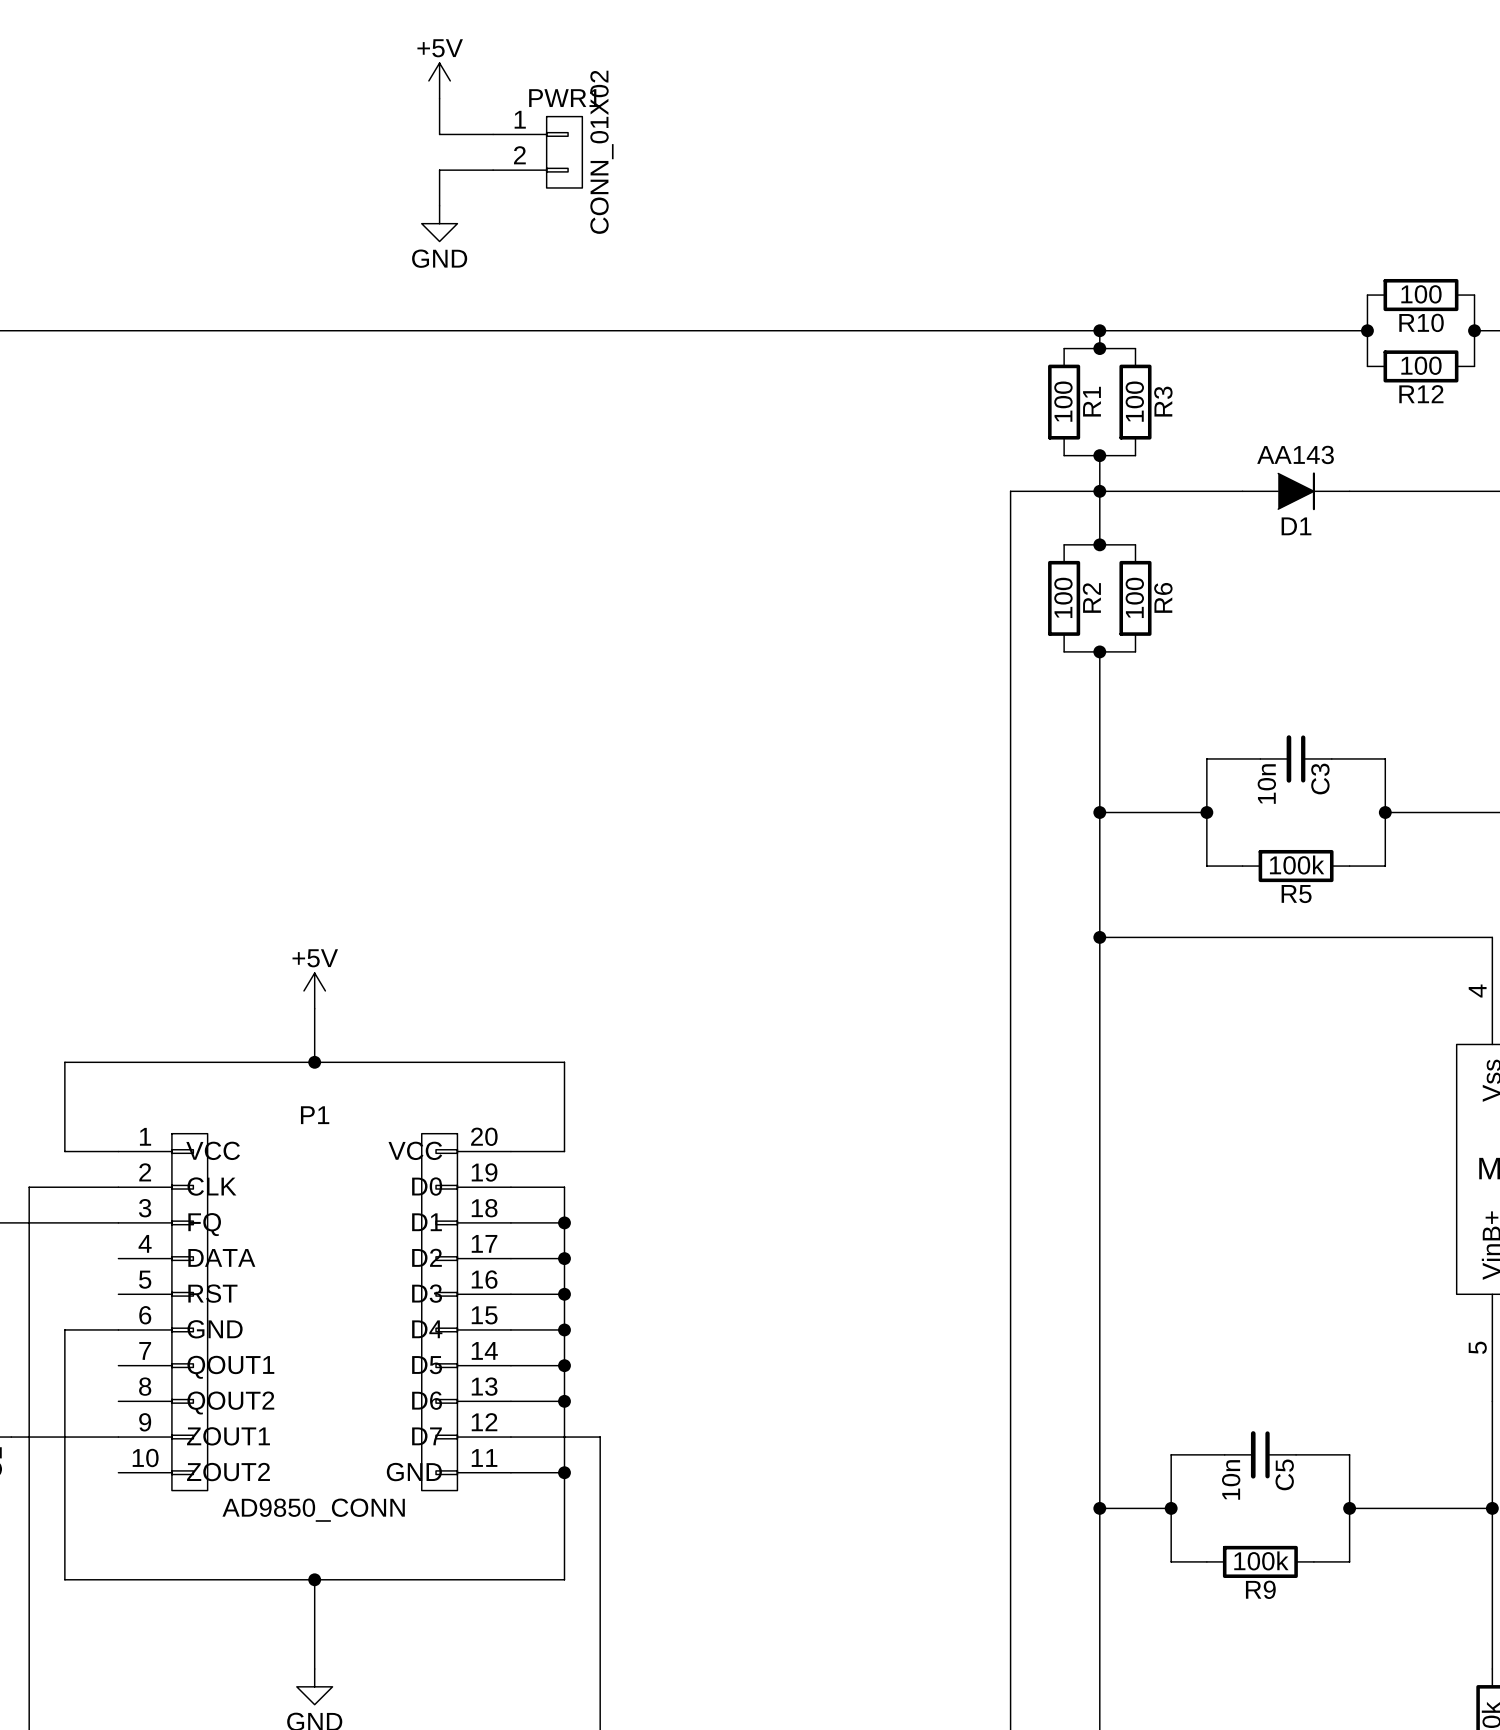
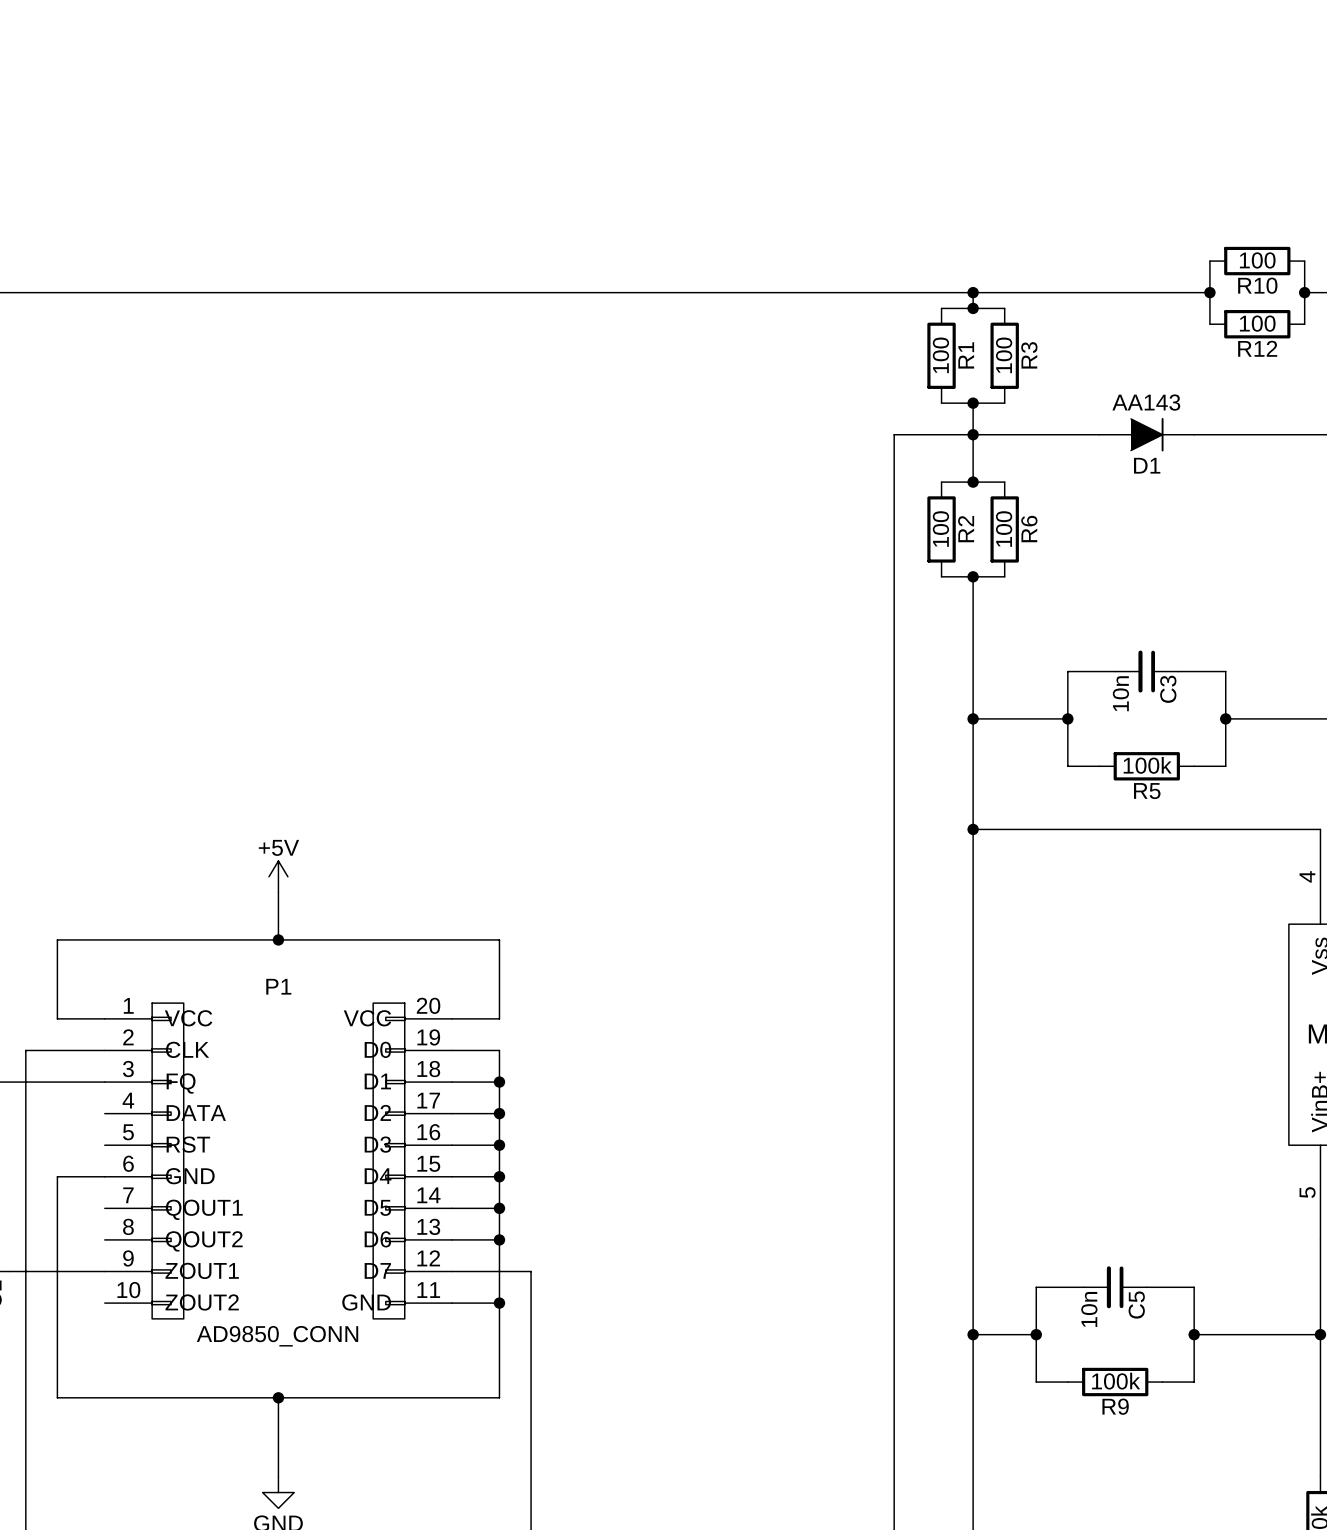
power symbol: +5V (439, 80) -> none
wire: (439, 98) (439, 134) (493, 134) -> none
PWR1: CONN_01X02 (537, 152) -> none
wire: (493, 170) (439, 170) (439, 205) -> none
power symbol: GND (439, 223) -> none

